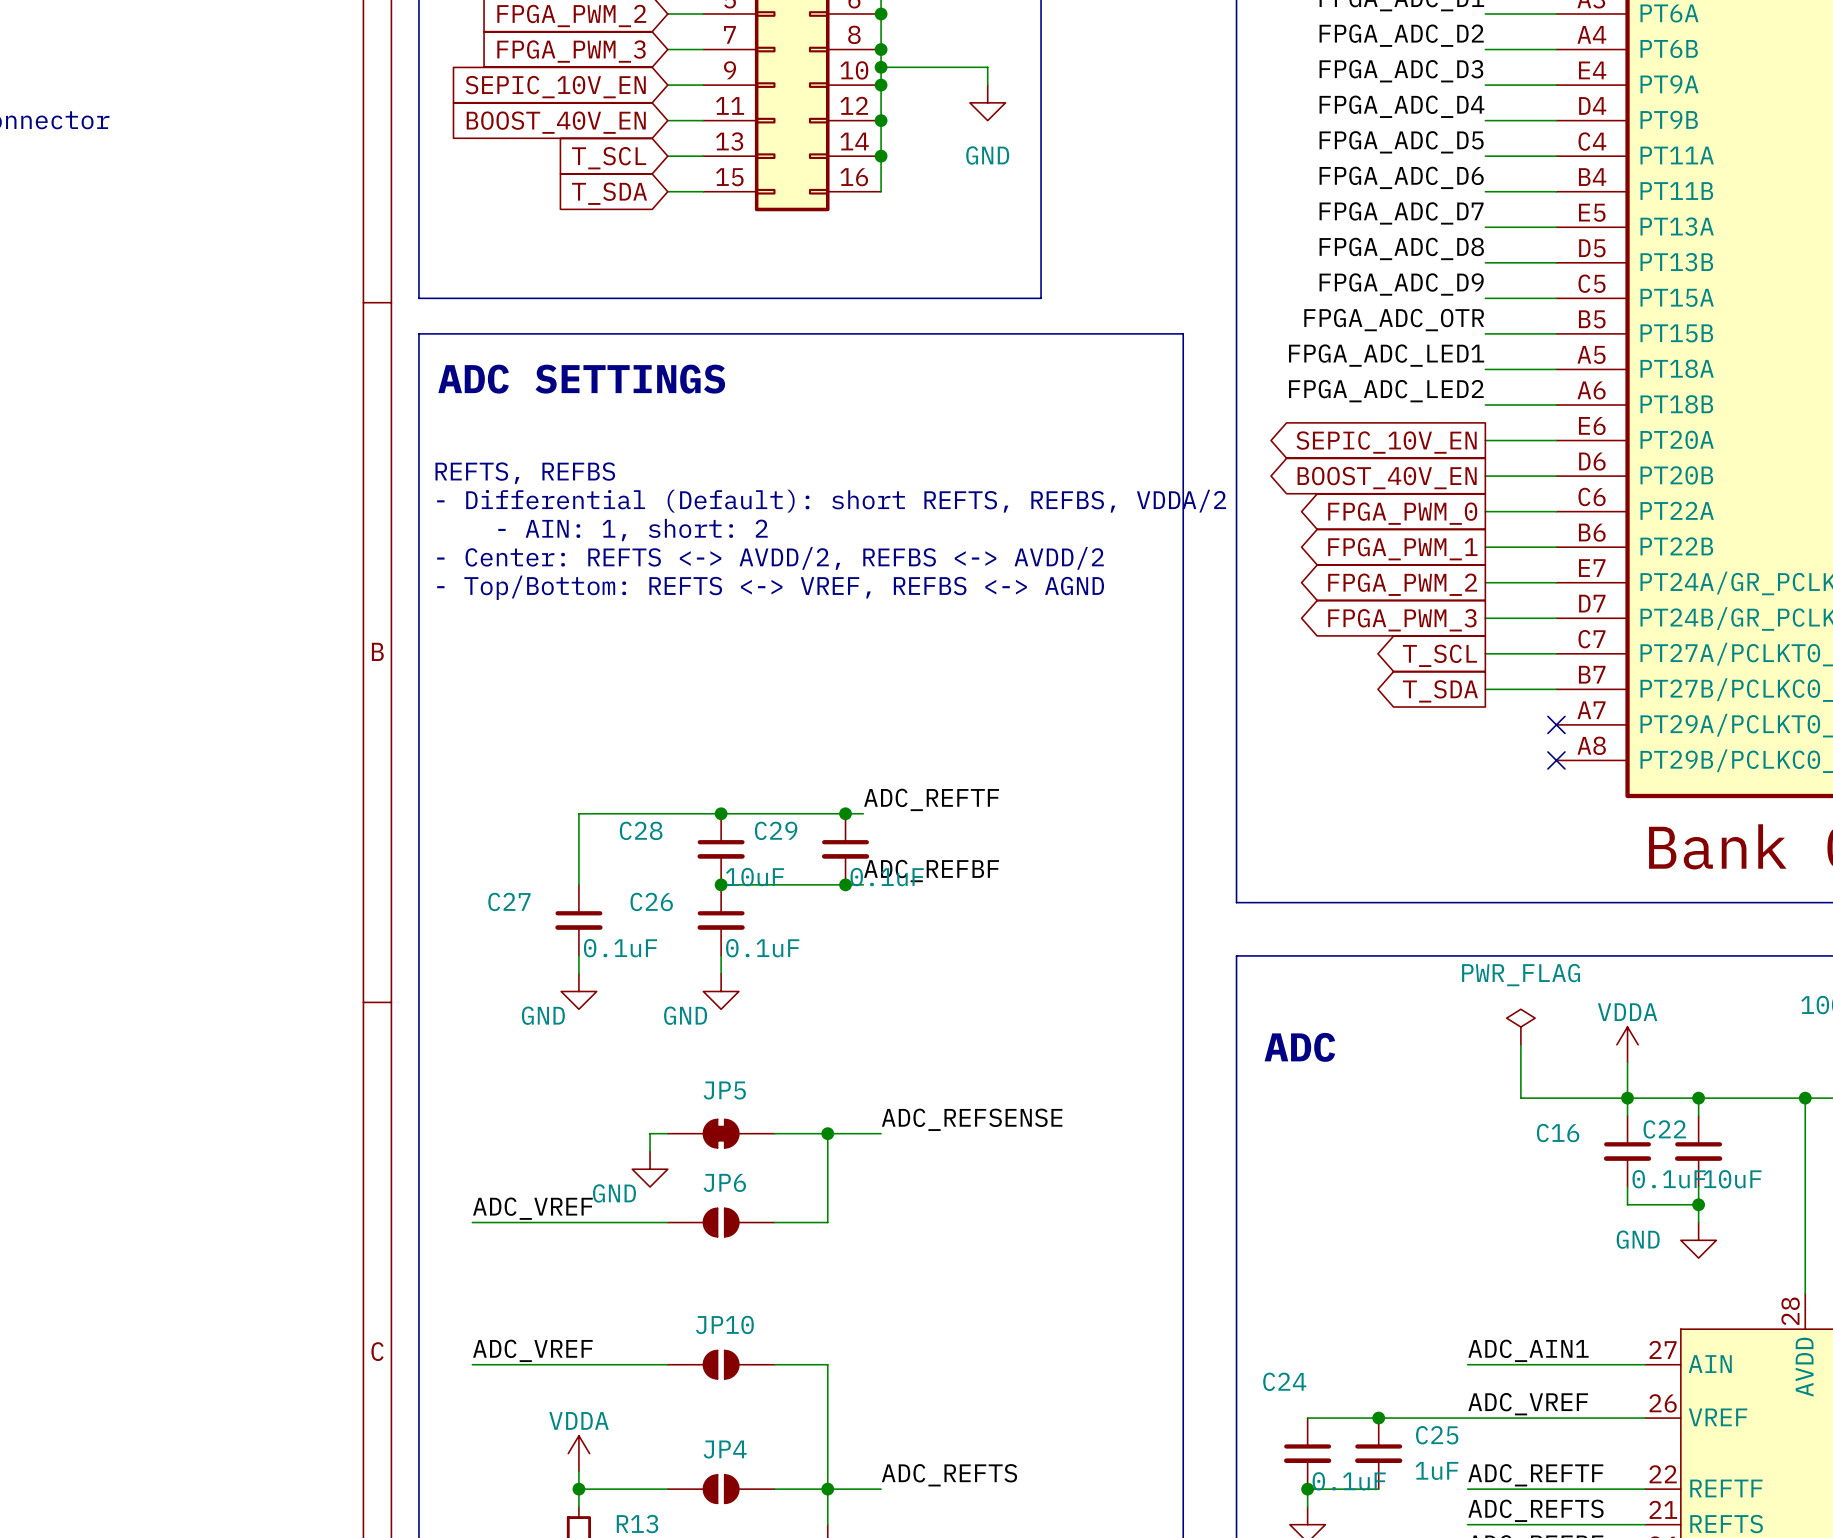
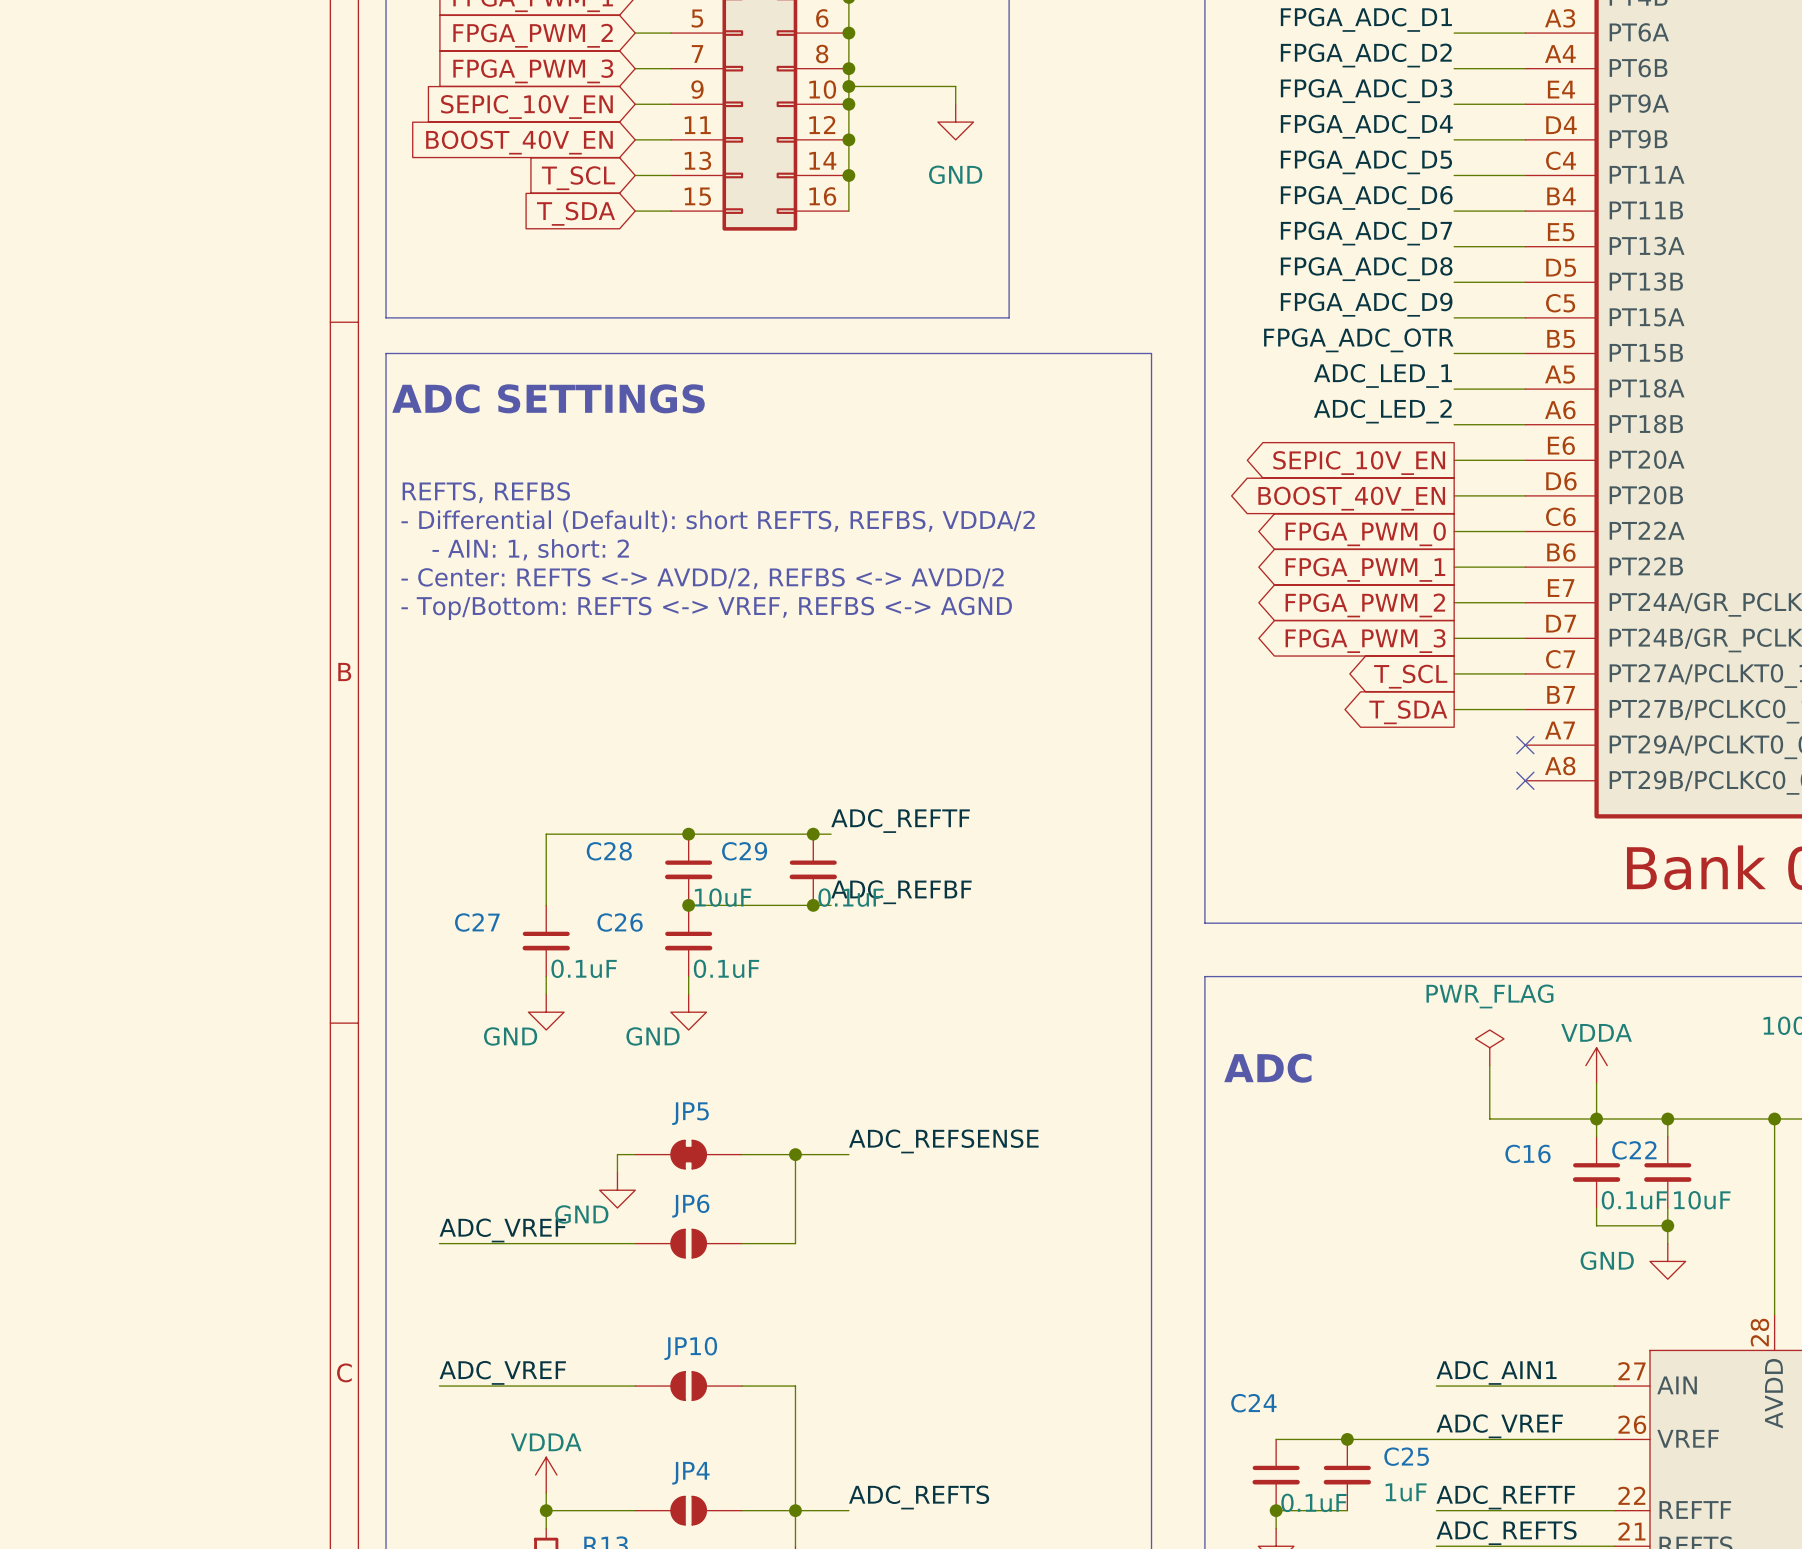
label: FPGA_ADC_LED1 (1386, 355) -> ADC_LED_1 (1382, 375)
label: FPGA_ADC_LED2 (1386, 391) -> ADC_LED_2 (1382, 411)

